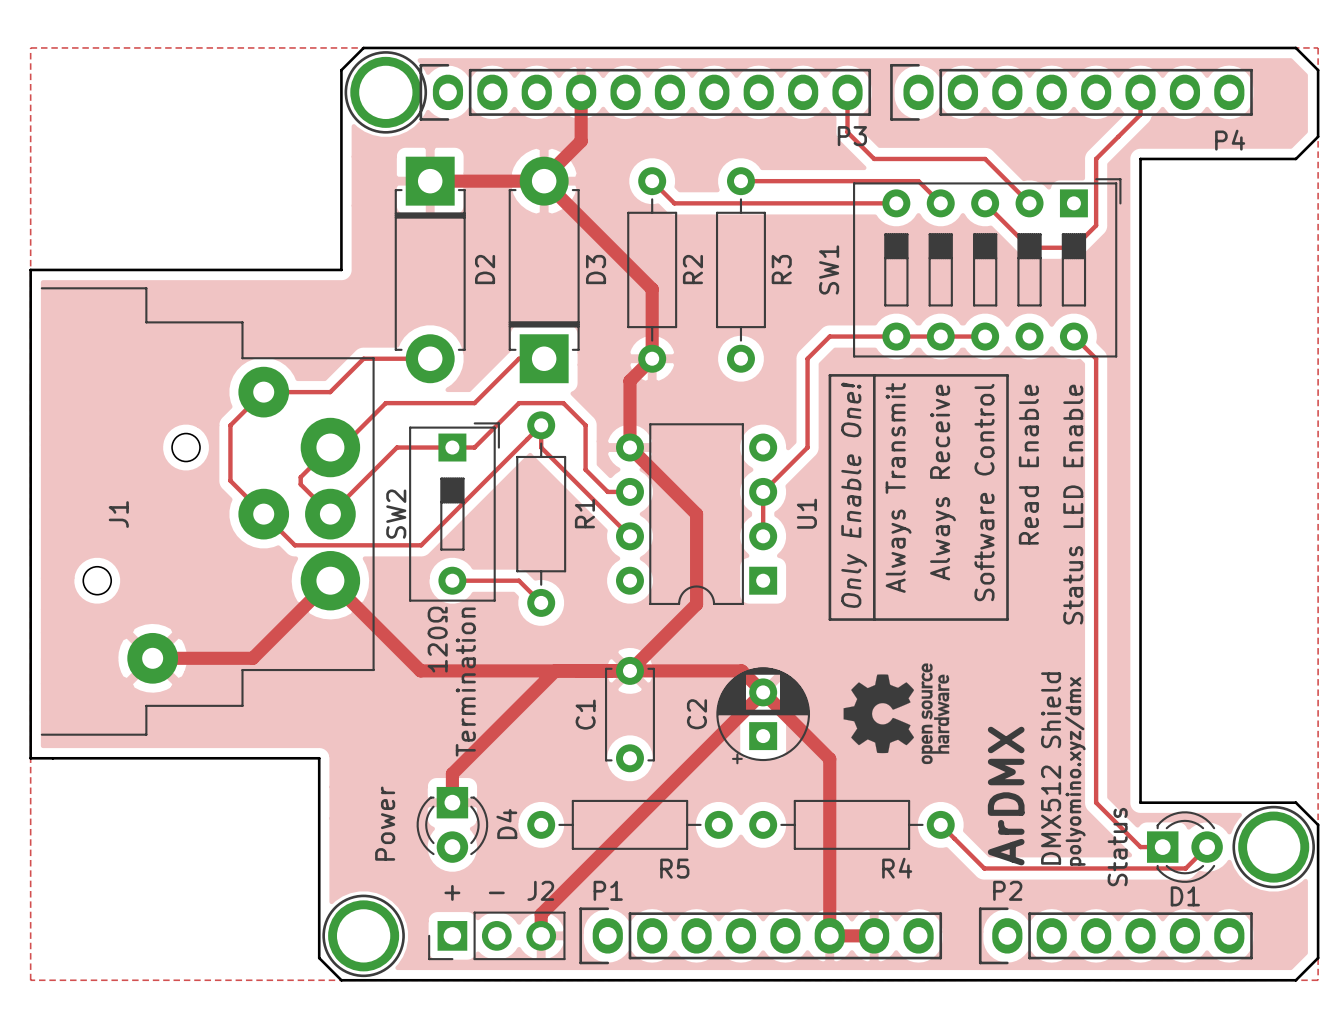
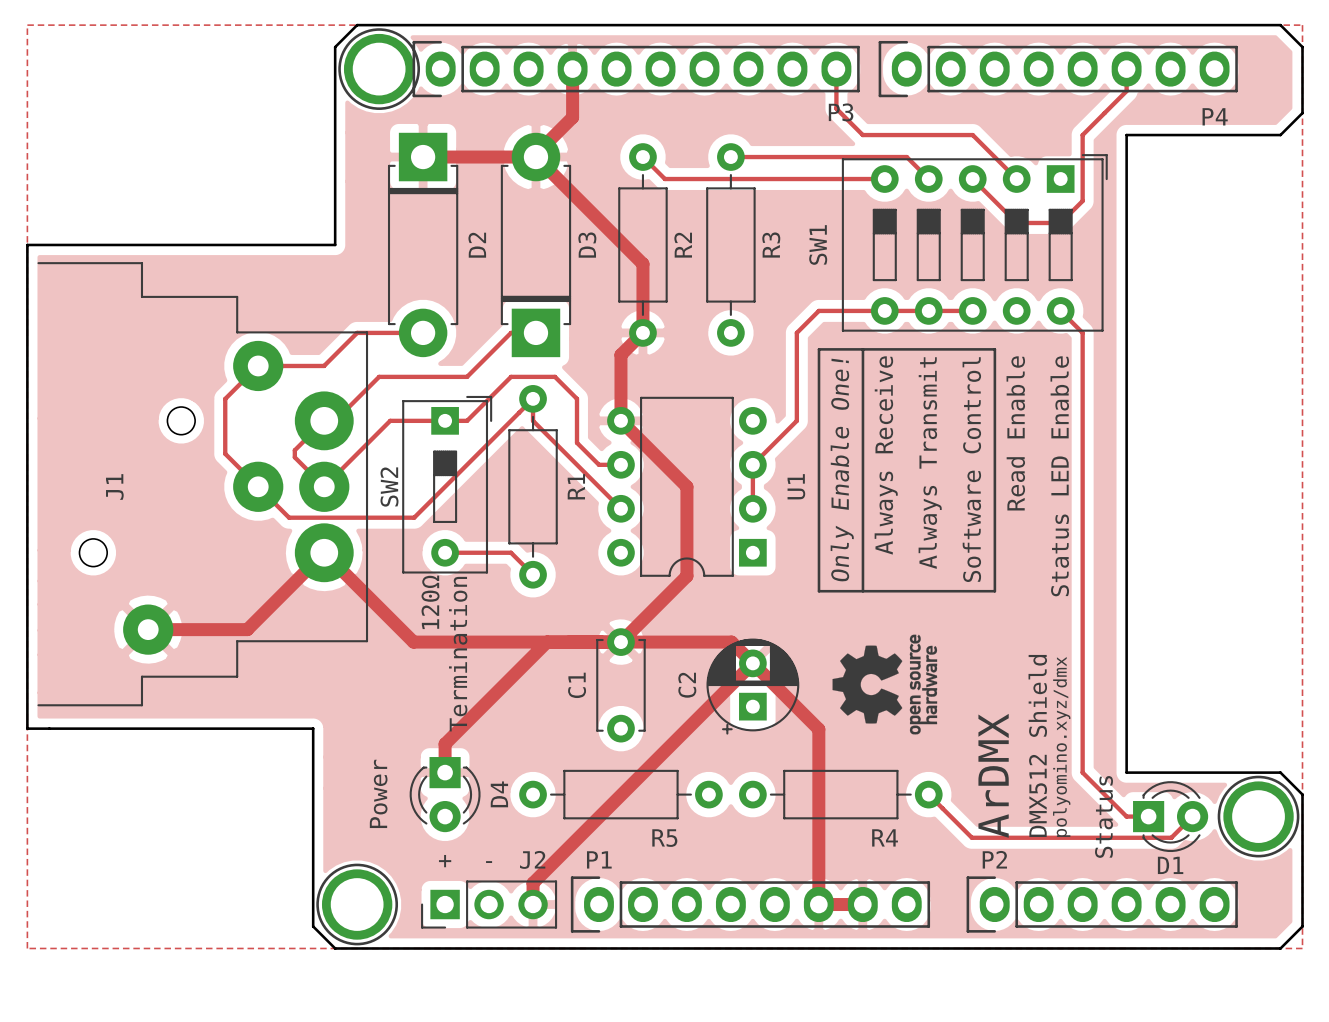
text: Always Receive (943, 482) -> Always Transmit (930, 463)
text: Always Transmit (898, 487) -> Always Receive (886, 455)

